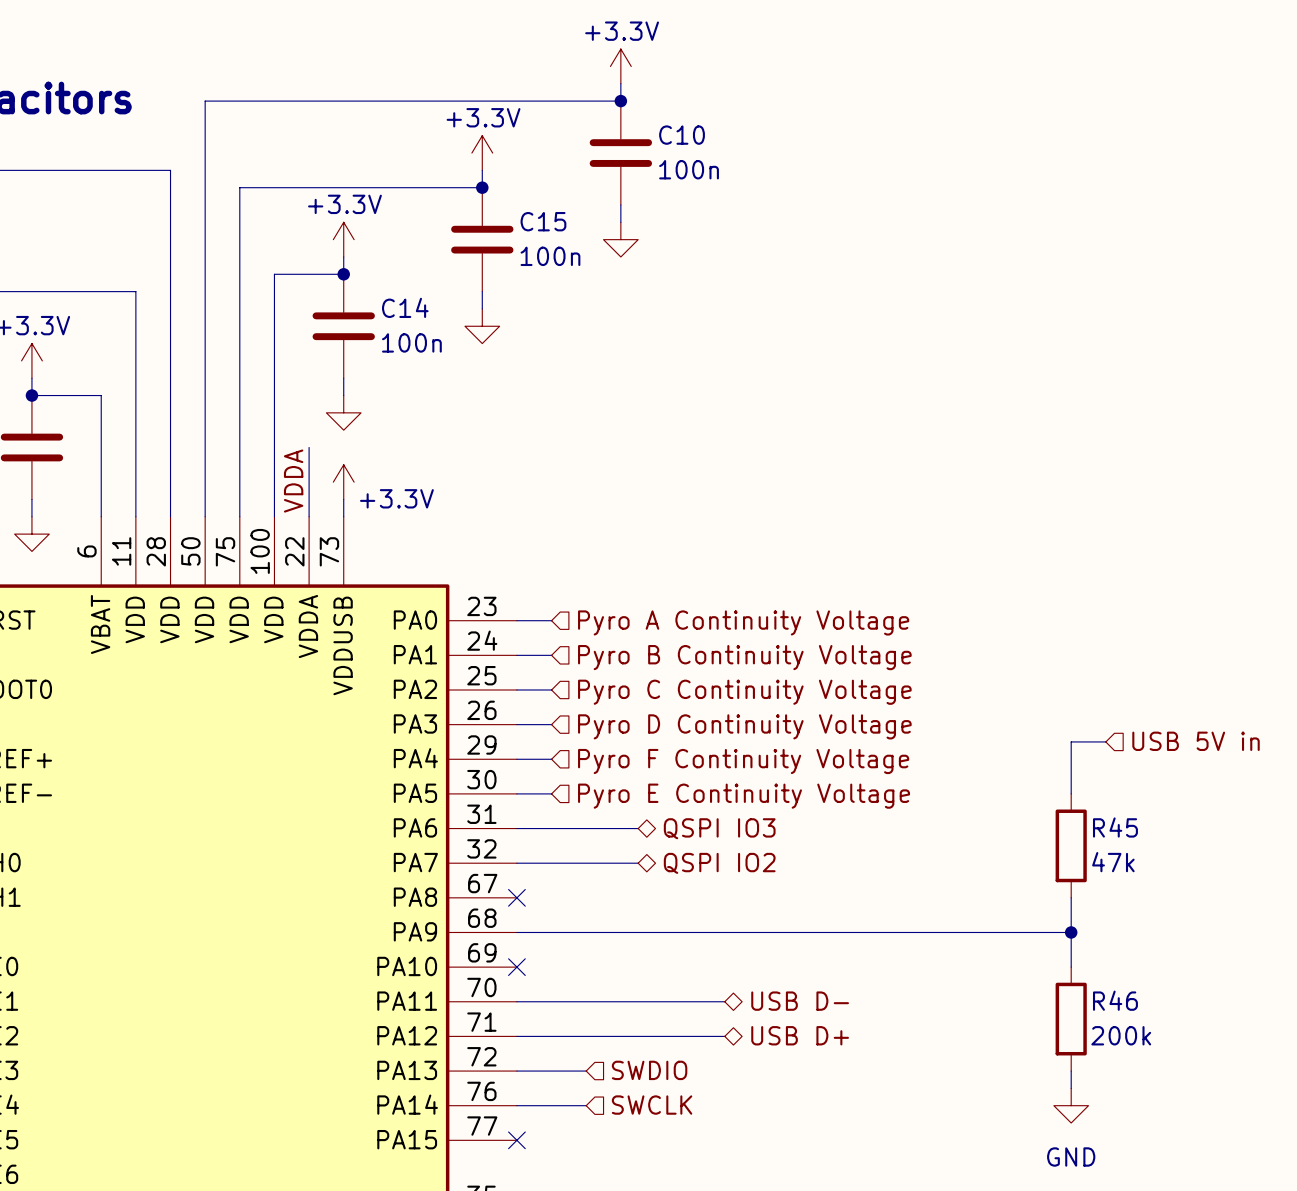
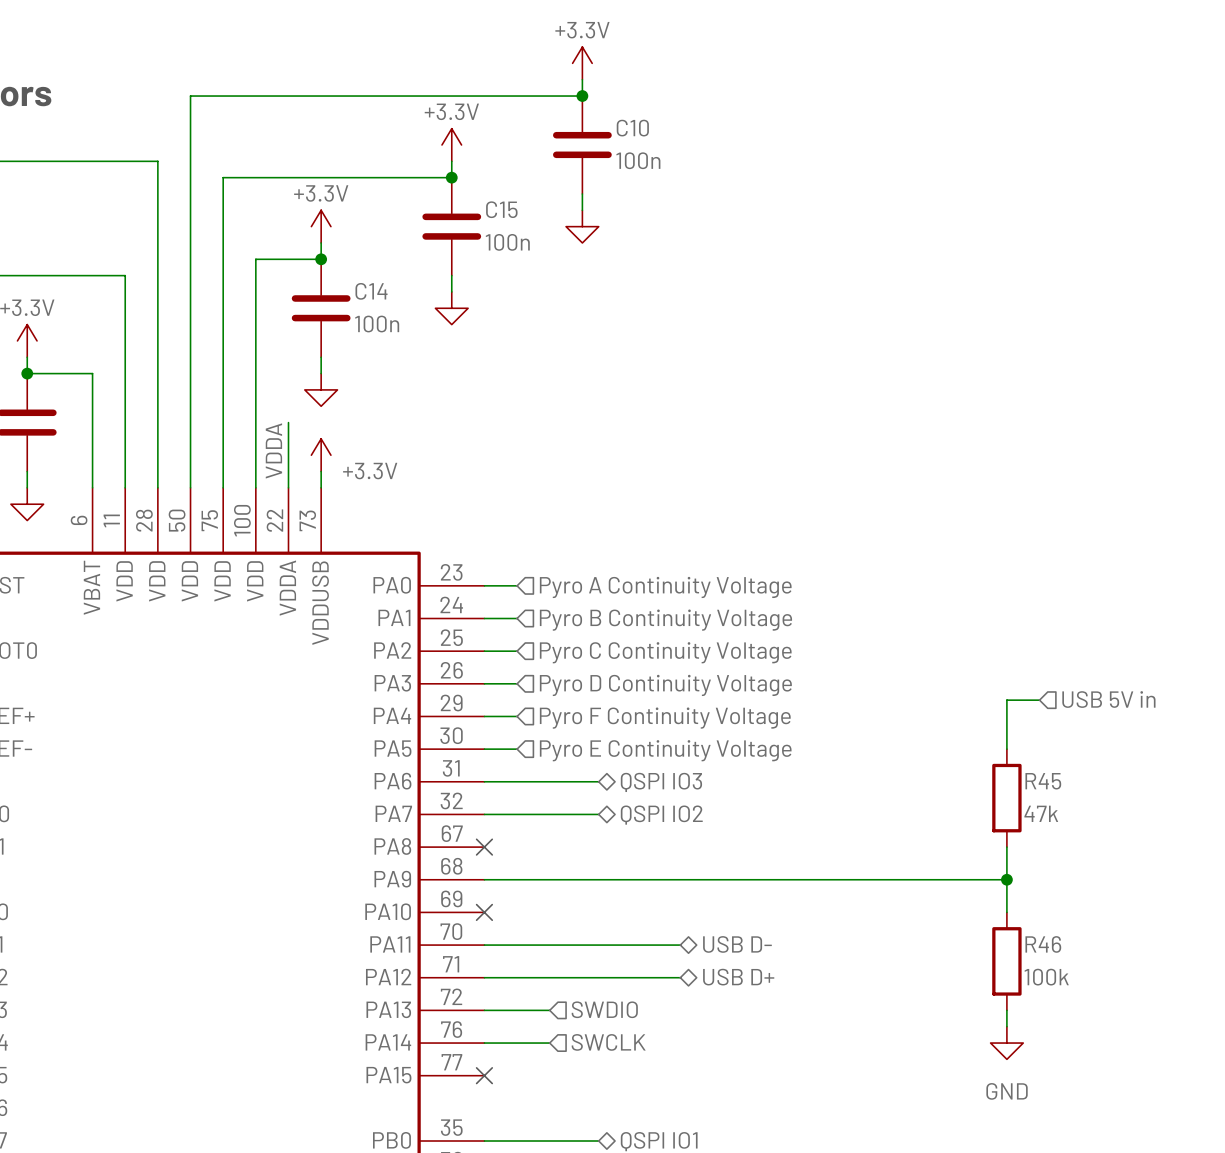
R46 value: 200k (1121, 1035) -> 100k (1046, 977)

